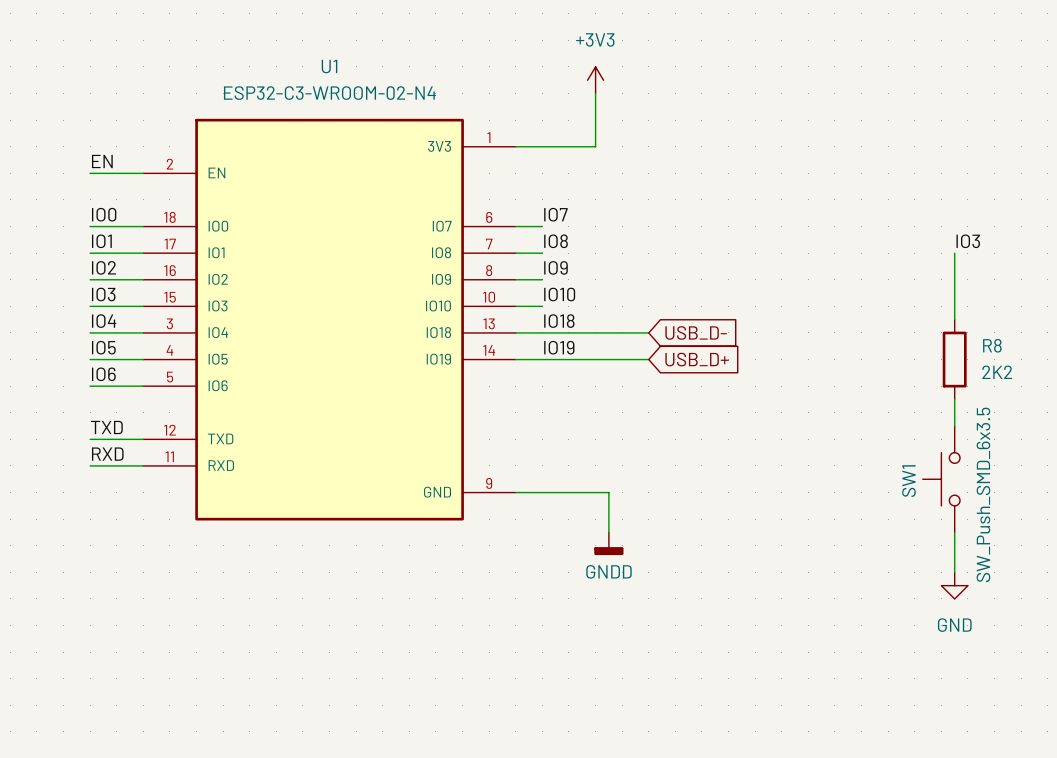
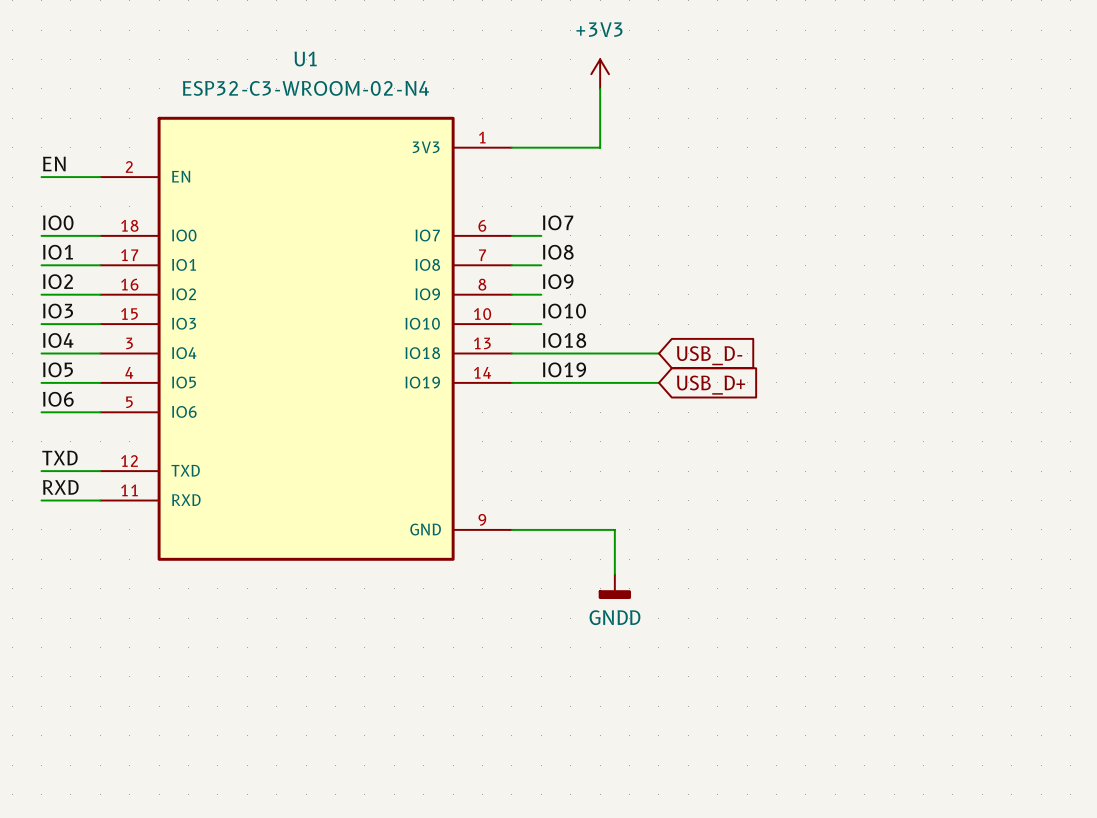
label: IO3 (968, 241) -> none
wire: (954, 253) (954, 319) -> none
R8: 2K2 (954, 359) -> none
wire: (954, 399) (954, 426) -> none
SW1: SW_Push_SMD_6x3.5 (941, 479) -> none
wire: (954, 532) (954, 572) -> none
power symbol: GND (954, 585) -> none

